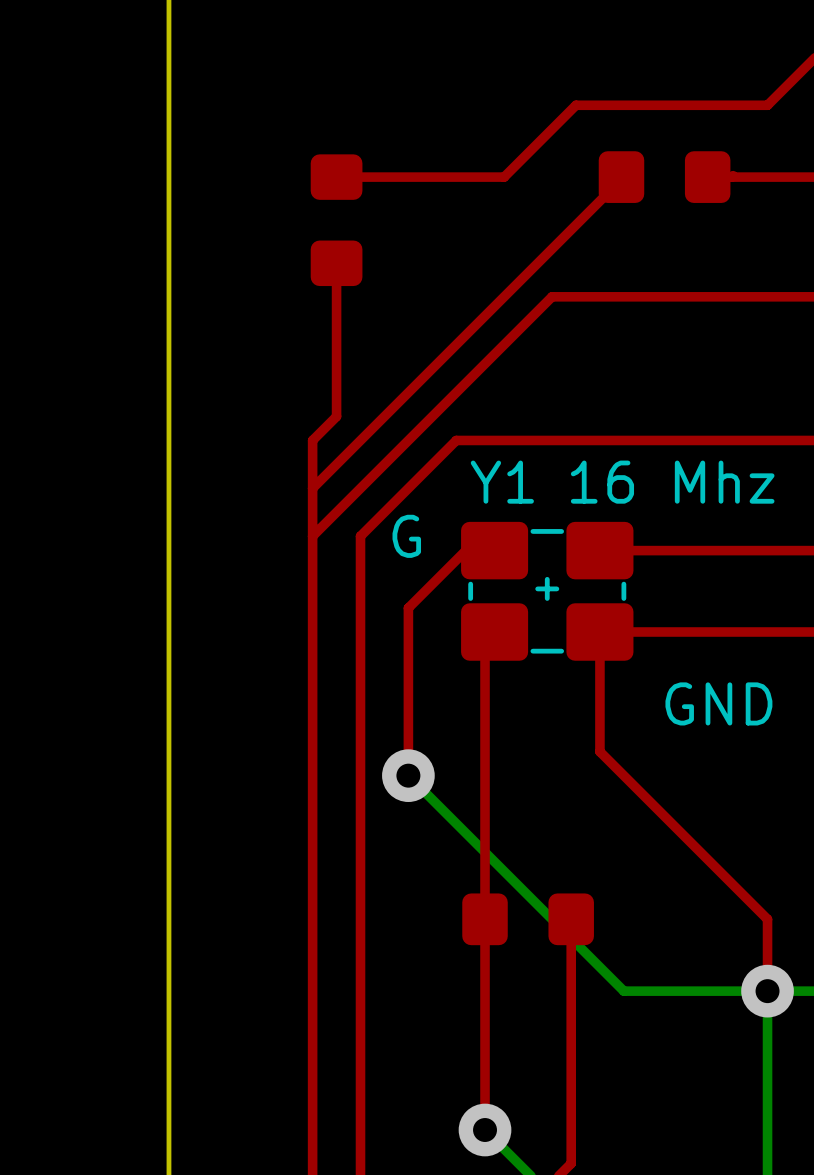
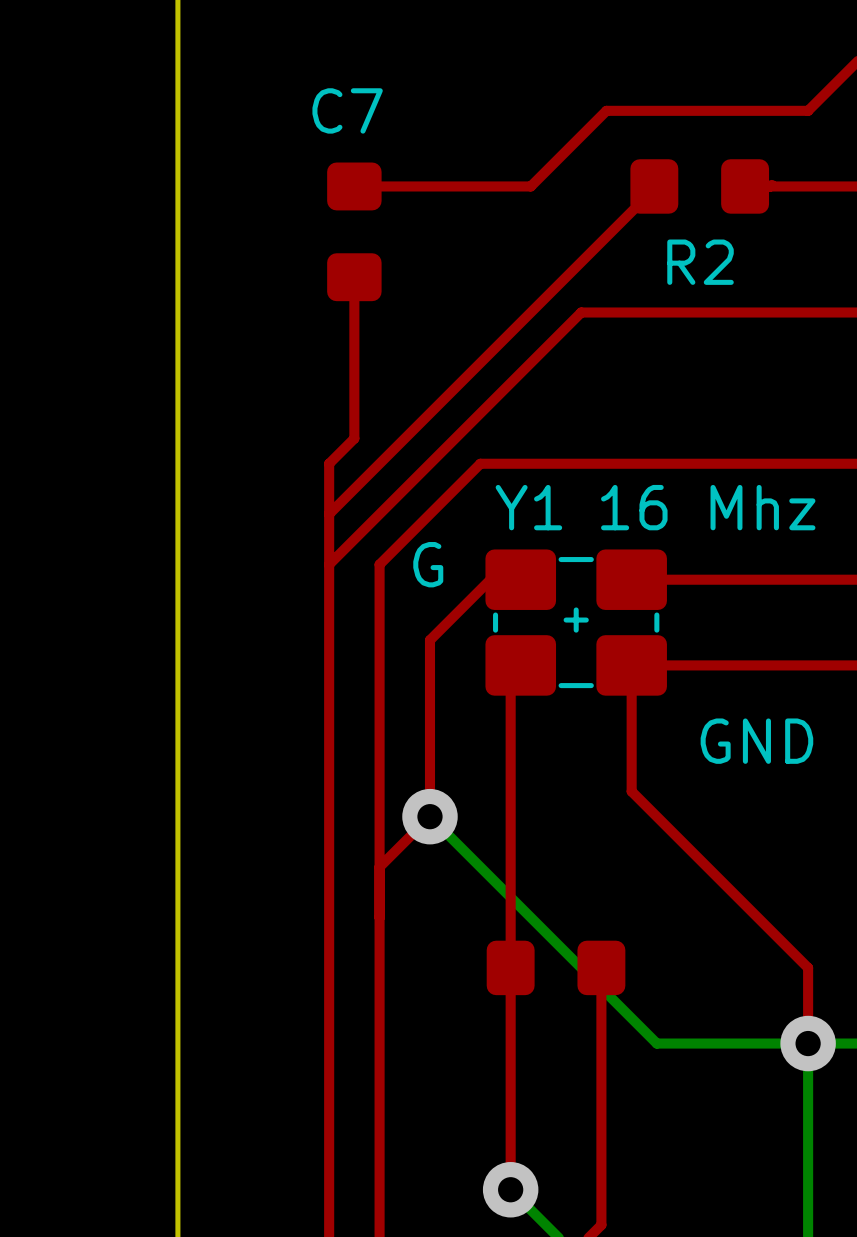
text: none -> C7 (347, 110)
text: none -> R2 (700, 262)
top track: none -> (429, 816) (379, 867)

